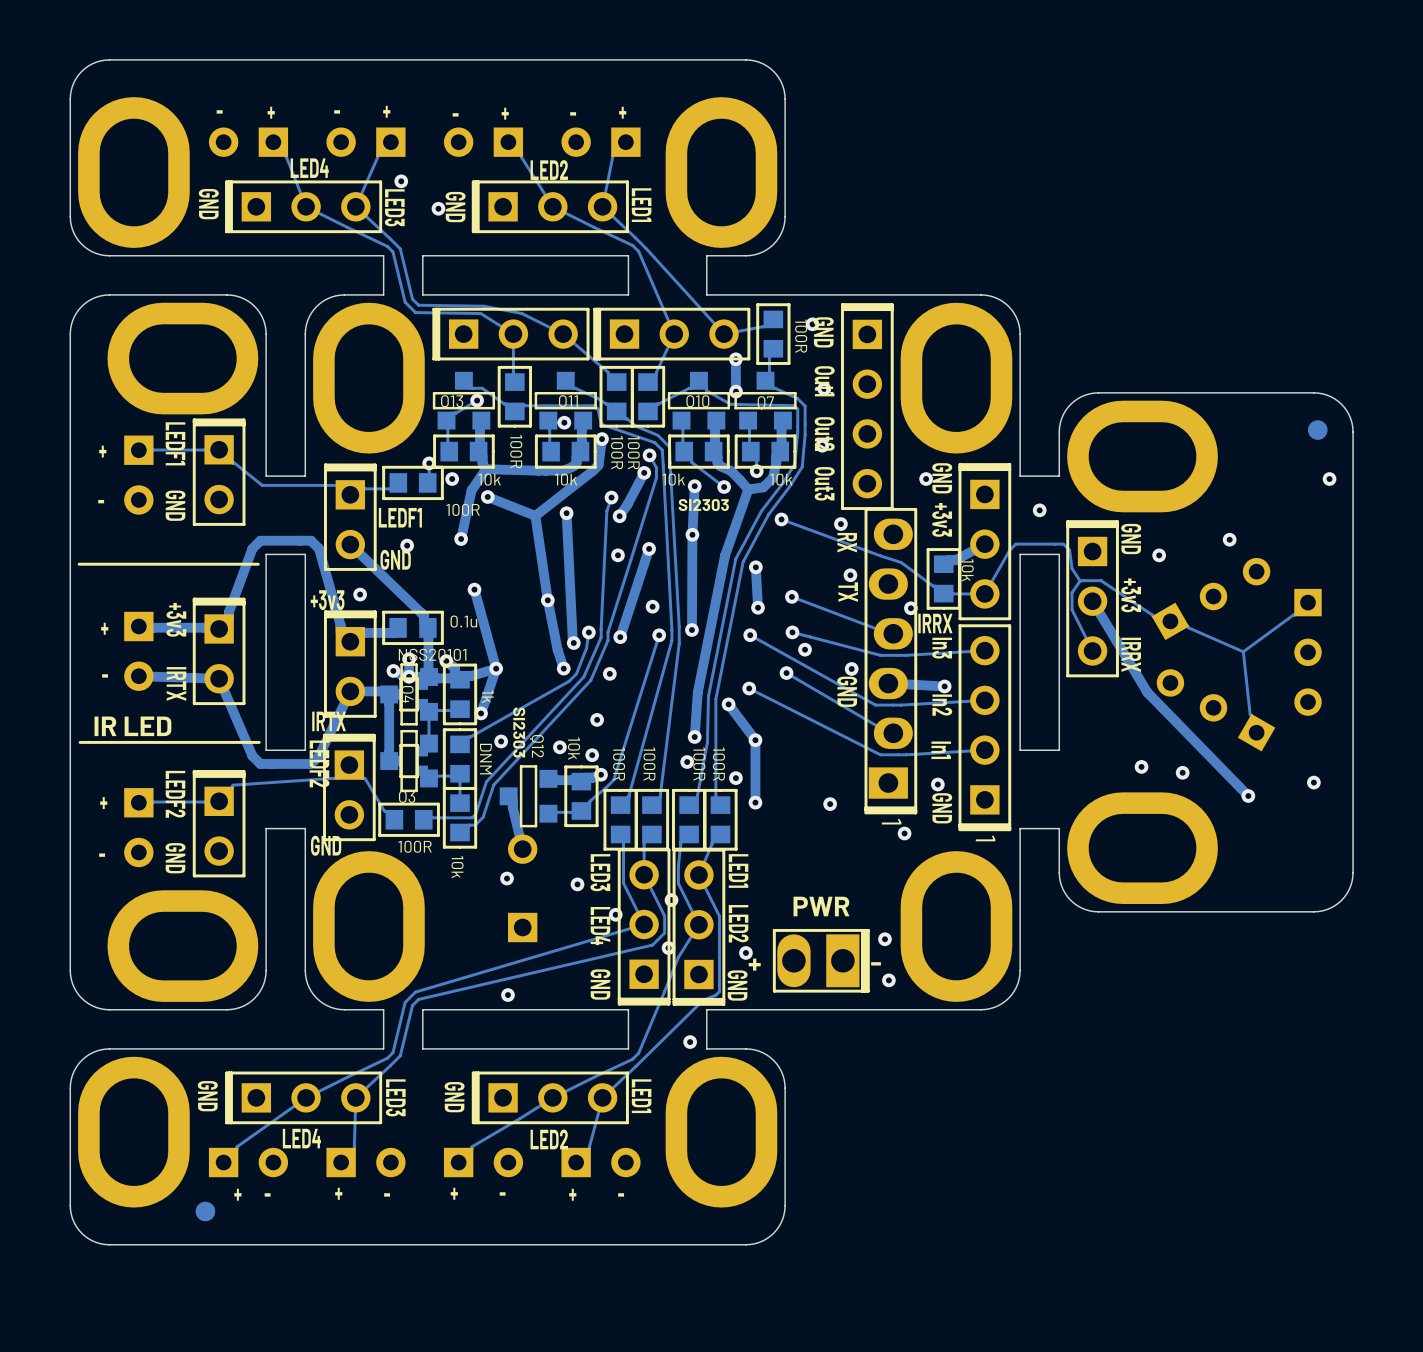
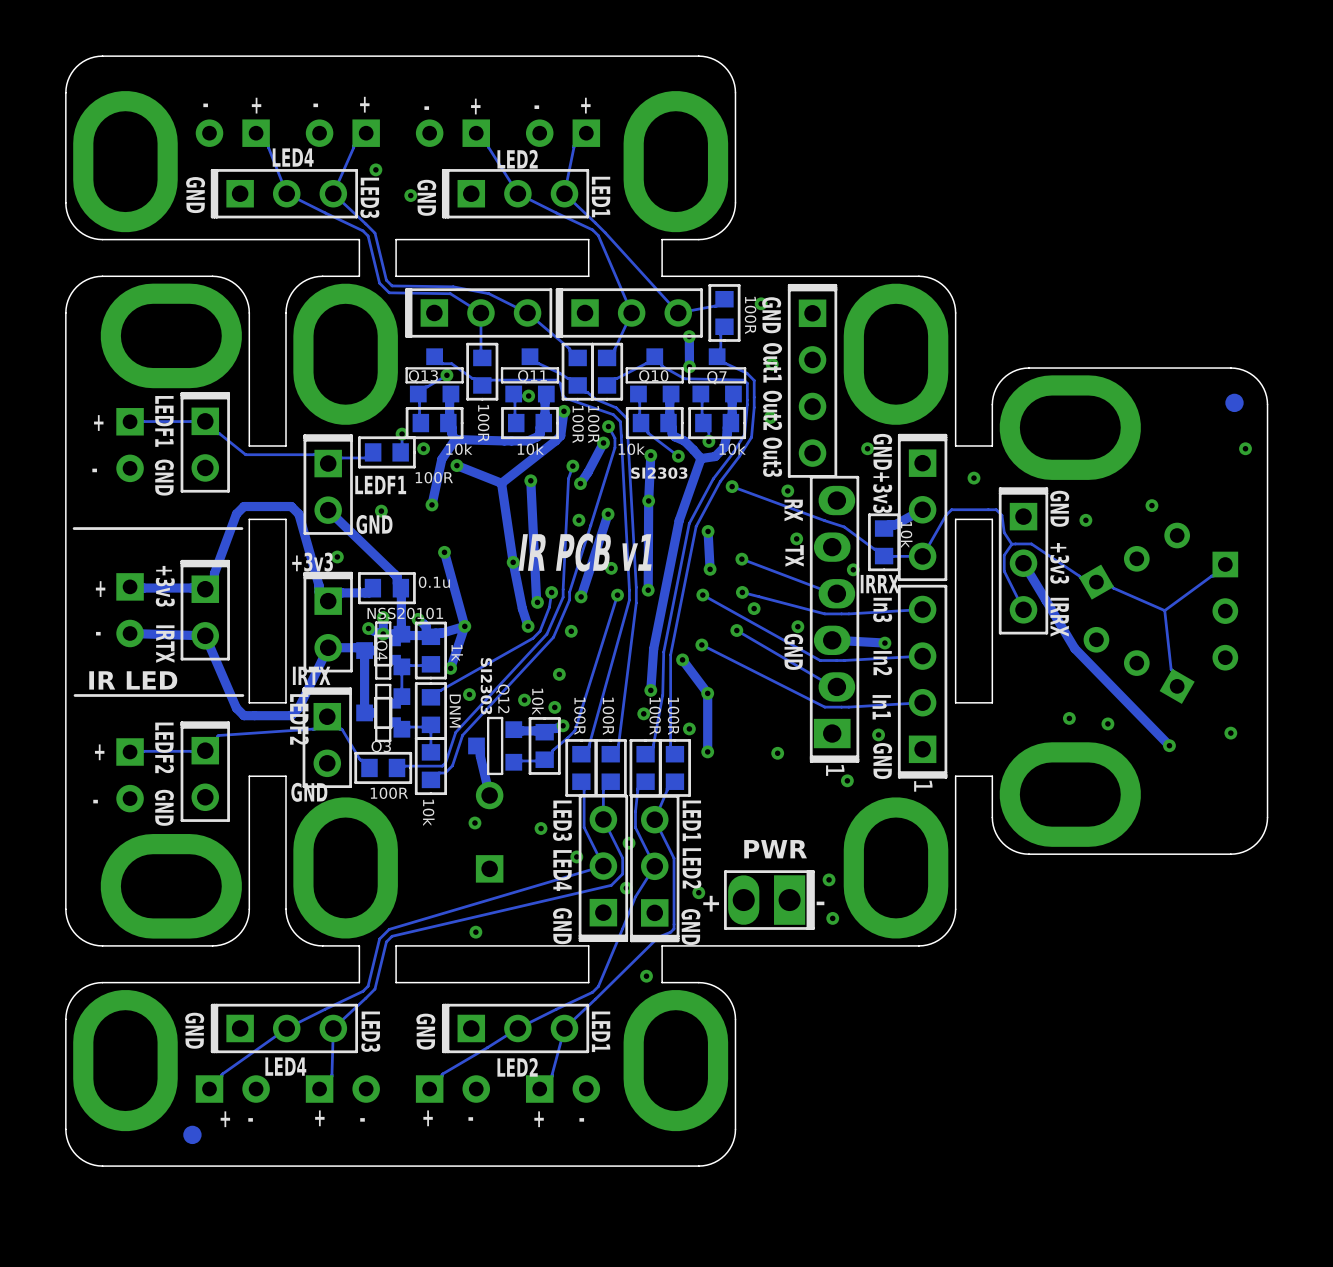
text: none -> IR PCB v1 (585, 552)

